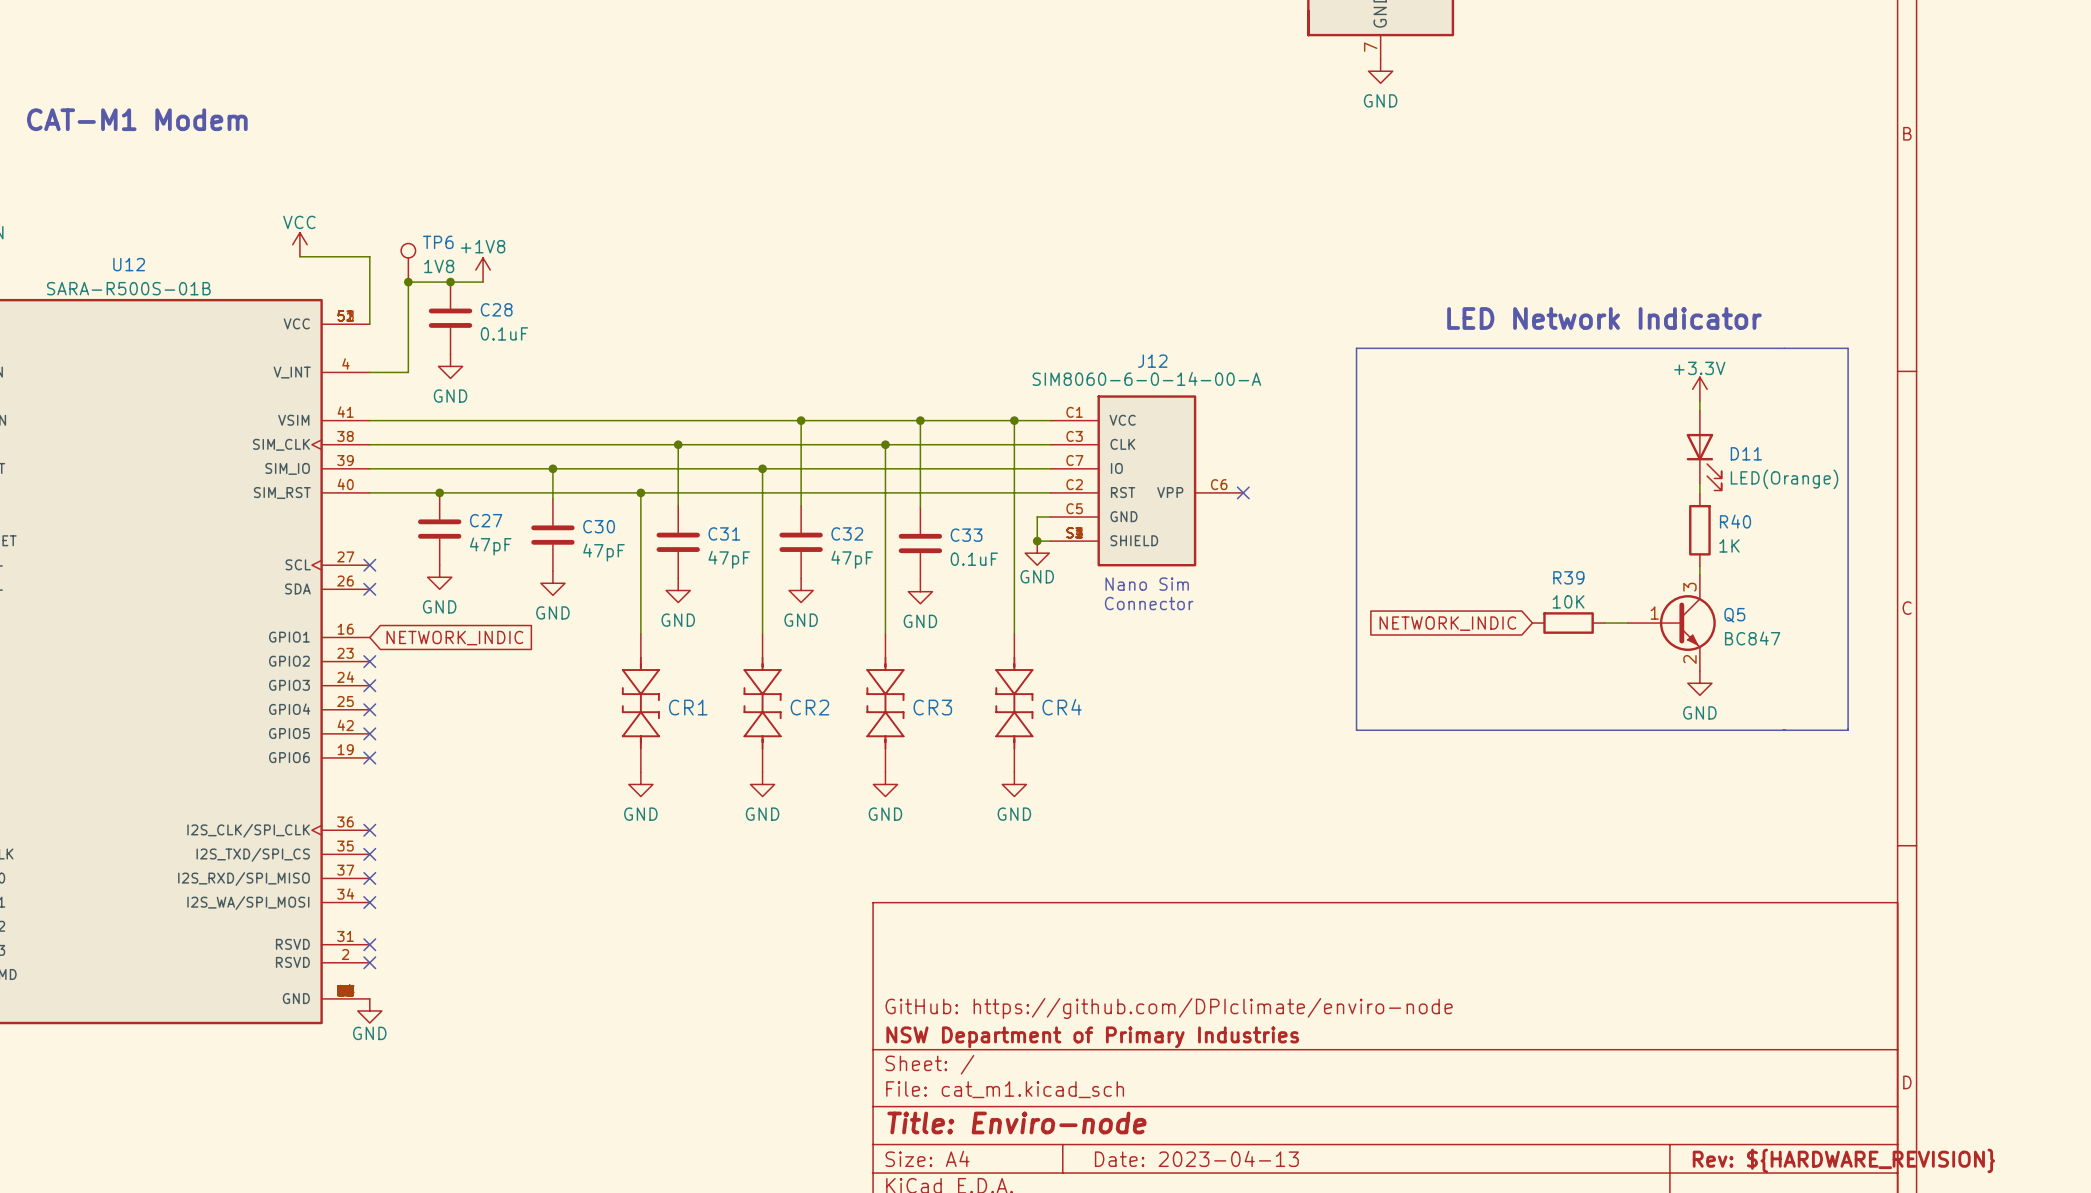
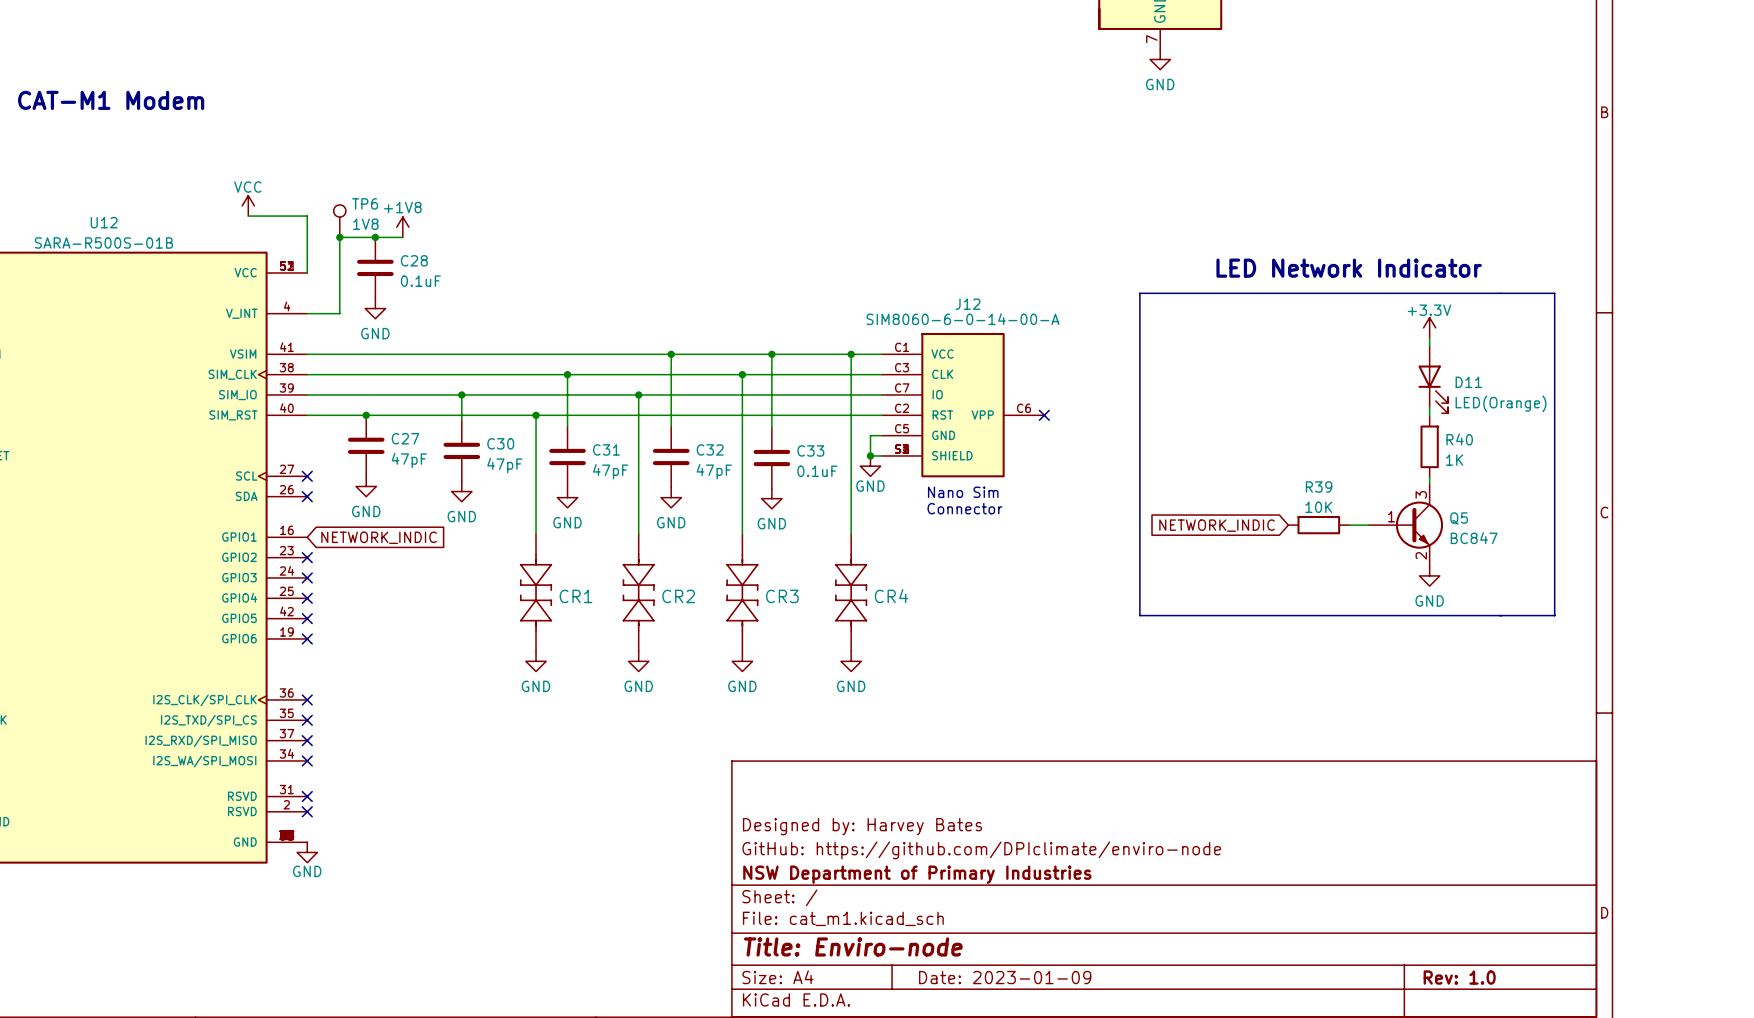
title block: none -> Designed by: Harvey Bates (862, 826)
title block: Date: 2023-04-13 (1196, 1158) -> Date: 2023-01-09 (1005, 977)
title block: Rev: ${HARDWARE_REVISION} (1843, 1160) -> Rev: 1.0 (1459, 977)

